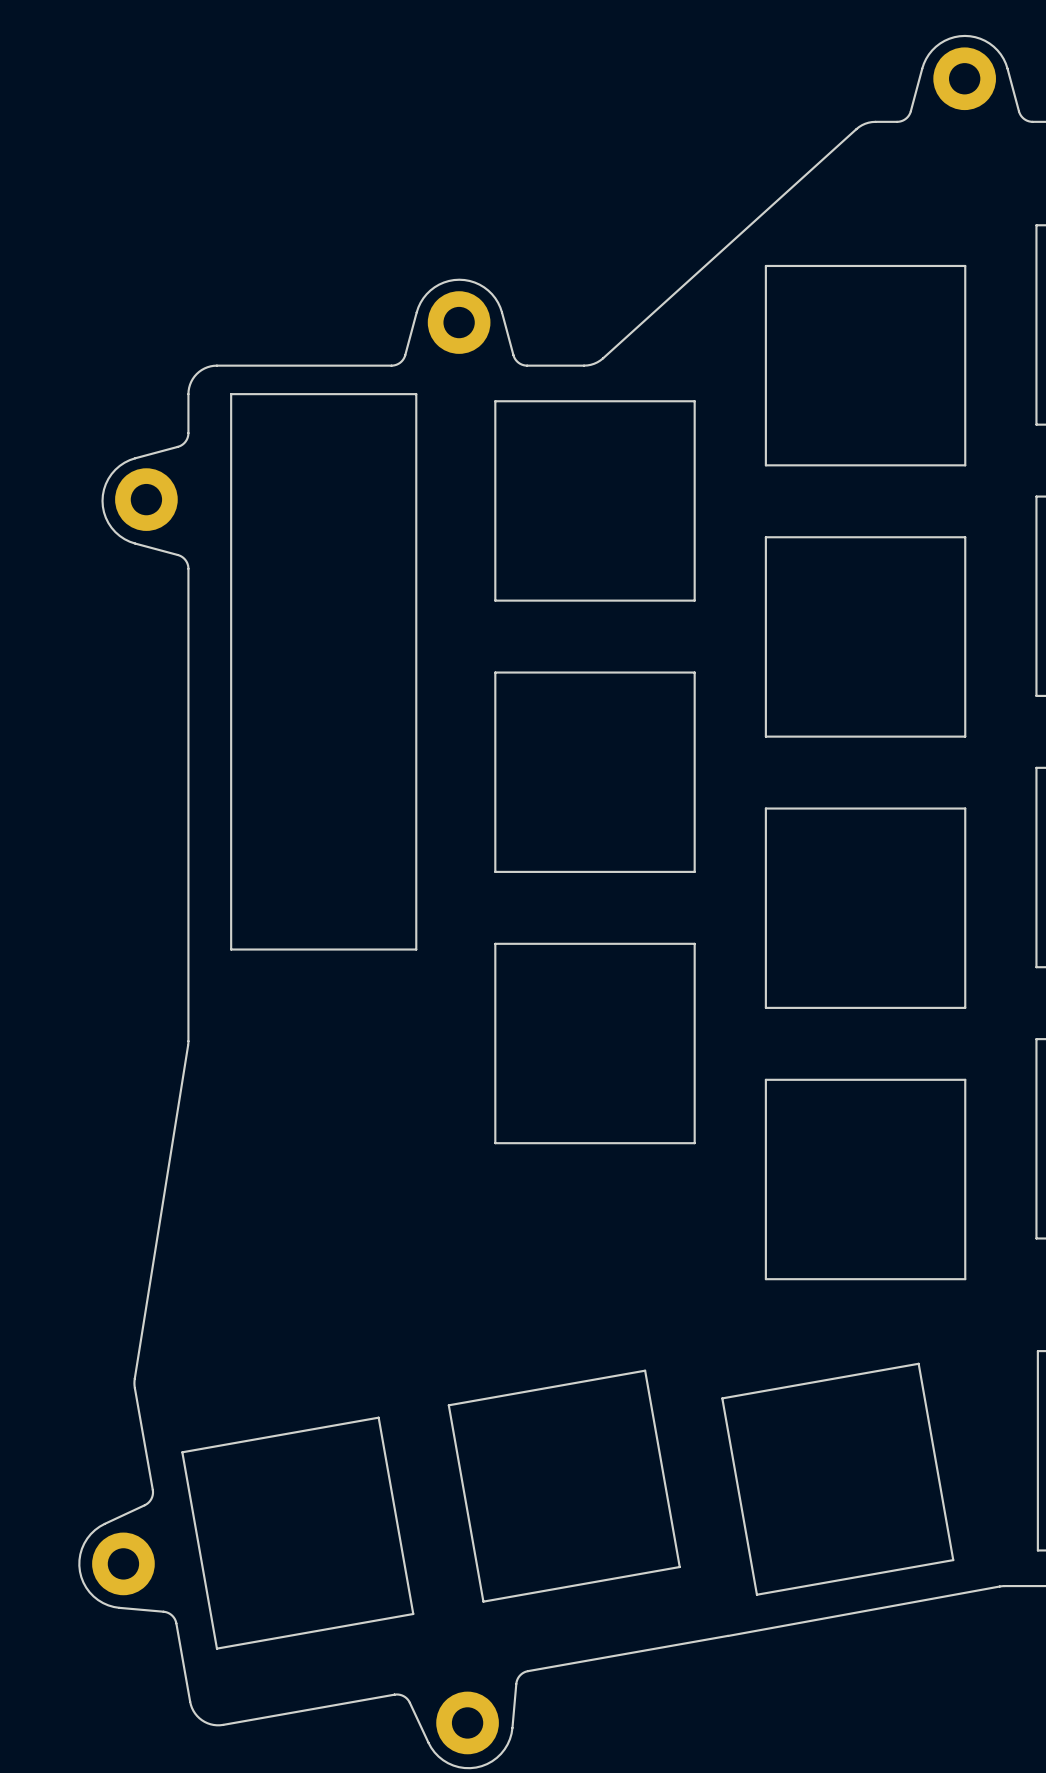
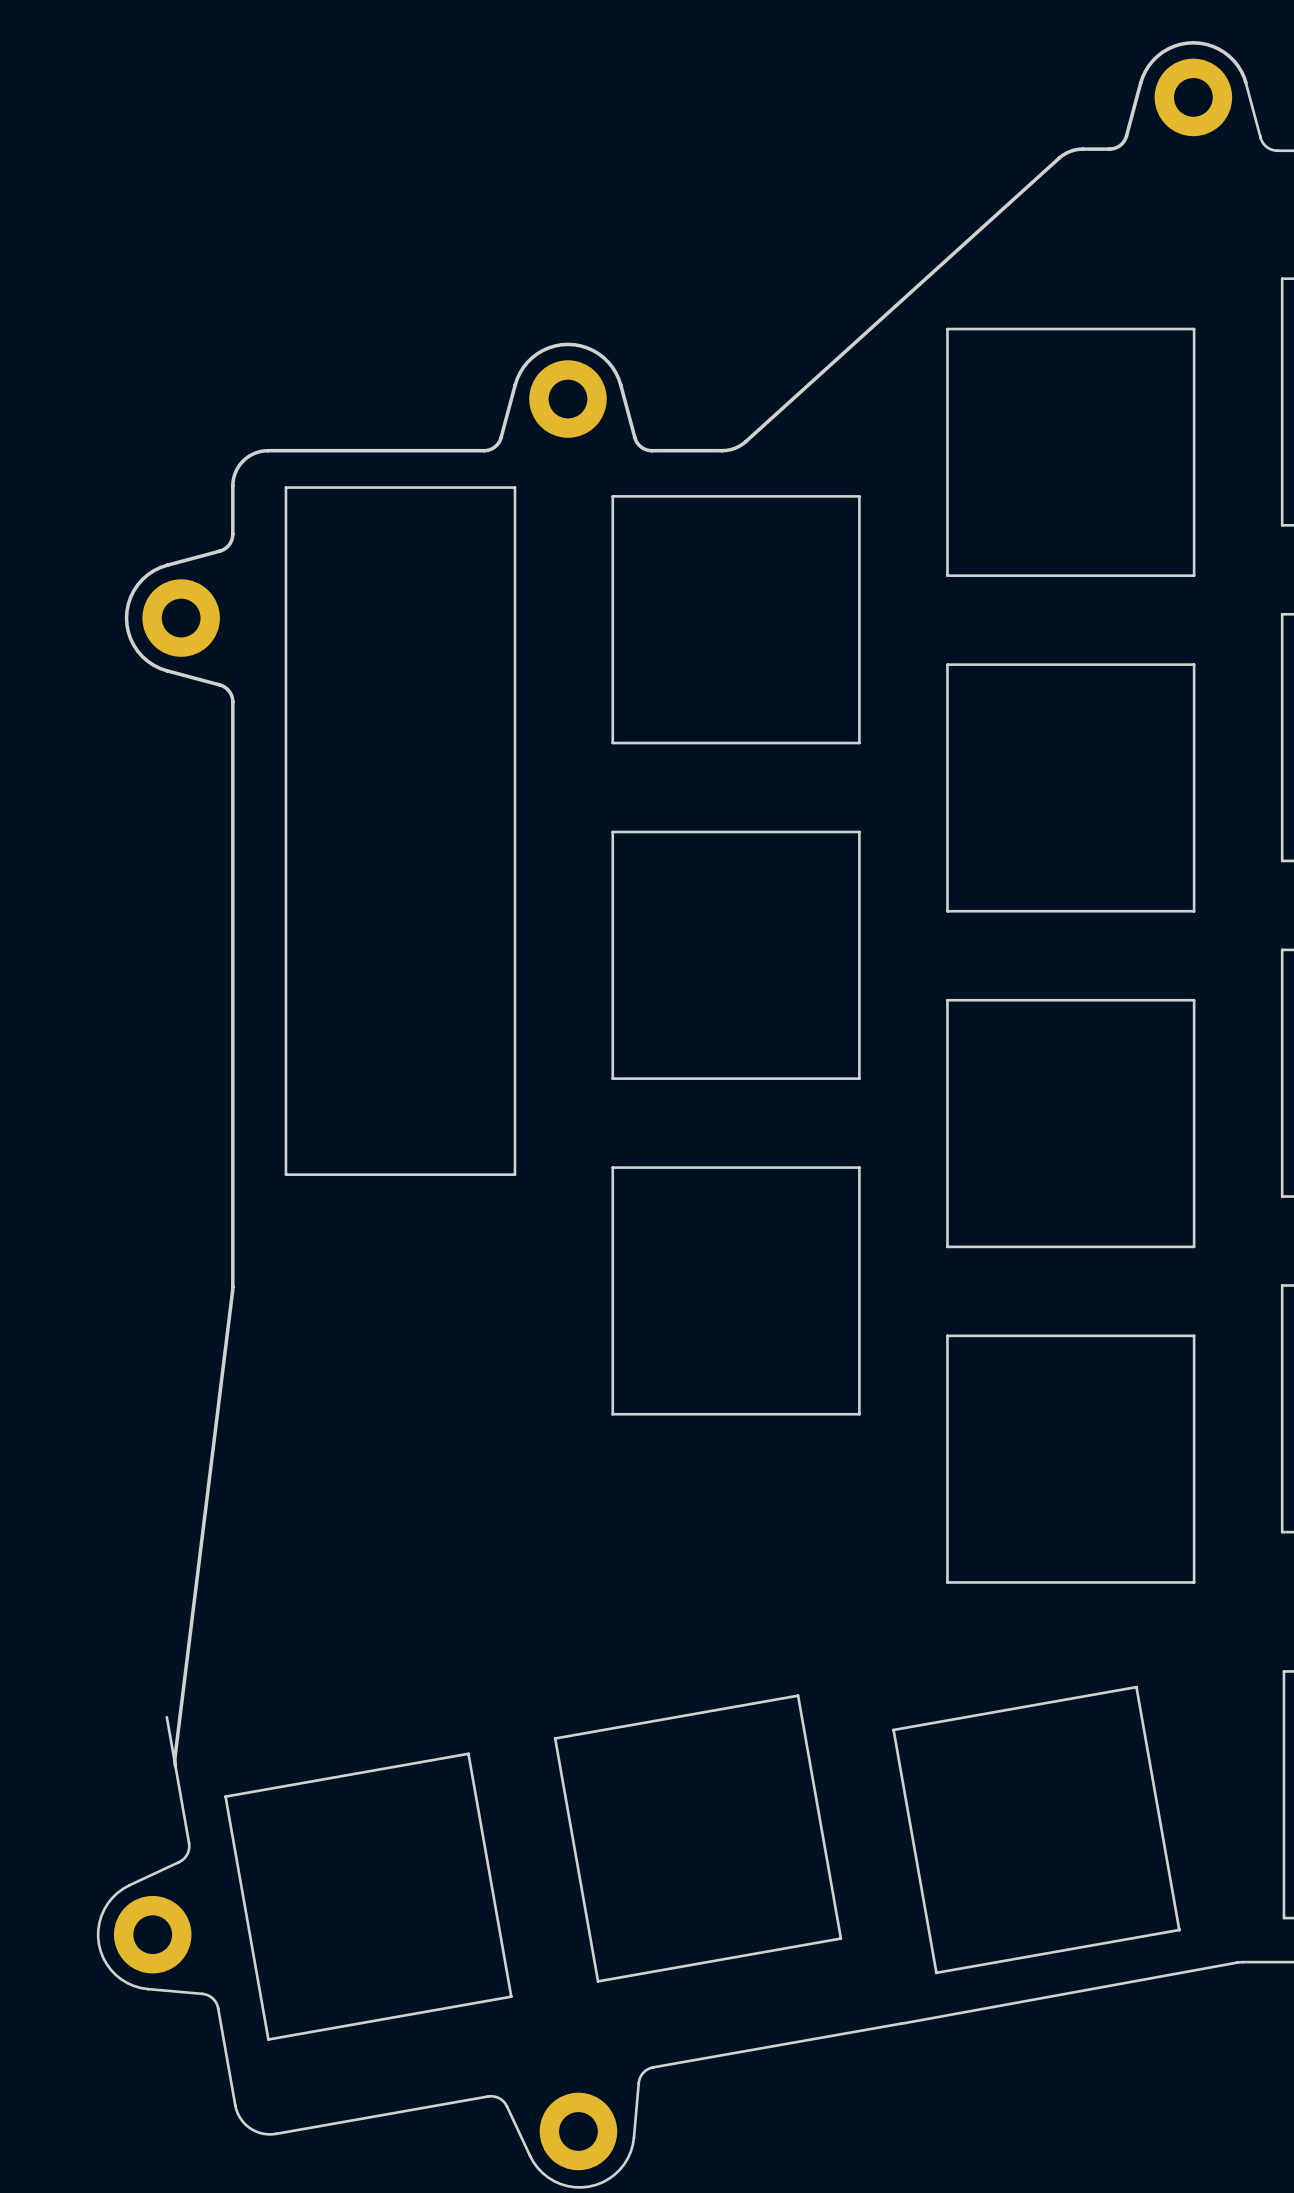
board edge: none -> (1246, 83) (1241, 71) (1233, 60) (1223, 52) (1212, 46) (1199, 43) (1186, 43) (1174, 46) (1162, 52) (1148, 65) (1142, 77) (1126, 136) (1121, 144) (1111, 148) (1074, 150) (1062, 155) (745, 441) (734, 448) (722, 450) (651, 450) (643, 448) (635, 439) (618, 378) (608, 362) (598, 353) (580, 345) (567, 344) (555, 345) (537, 353) (523, 367) (515, 384) (500, 439) (496, 445) (489, 449) (268, 450) (249, 456) (238, 467) (233, 478) (232, 536) (229, 544) (219, 551) (160, 567) (142, 579) (133, 590) (128, 603) (127, 625) (133, 645) (142, 656) (160, 668) (223, 686) (230, 692) (232, 701) (232, 1289) (175, 1755) (175, 1766)
board edge: (1007, 68) (997, 50) (980, 38) (959, 36) (940, 43) (928, 54) (923, 63) (910, 111) (906, 117) (898, 121) (868, 122) (859, 127) (603, 358) (594, 363) (584, 365) (527, 365) (520, 363) (514, 356) (500, 307) (492, 294) (479, 284) (469, 280) (448, 280) (434, 287) (423, 298) (416, 312) (404, 356) (396, 364) (216, 365) (201, 370) (192, 378) (189, 387) (188, 434) (185, 441) (177, 446) (129, 460) (119, 465) (108, 478) (104, 489) (102, 506) (105, 517) (115, 532) (129, 541) (180, 556) (186, 561) (188, 568) (188, 1043) (134, 1378) (134, 1388) -> none

